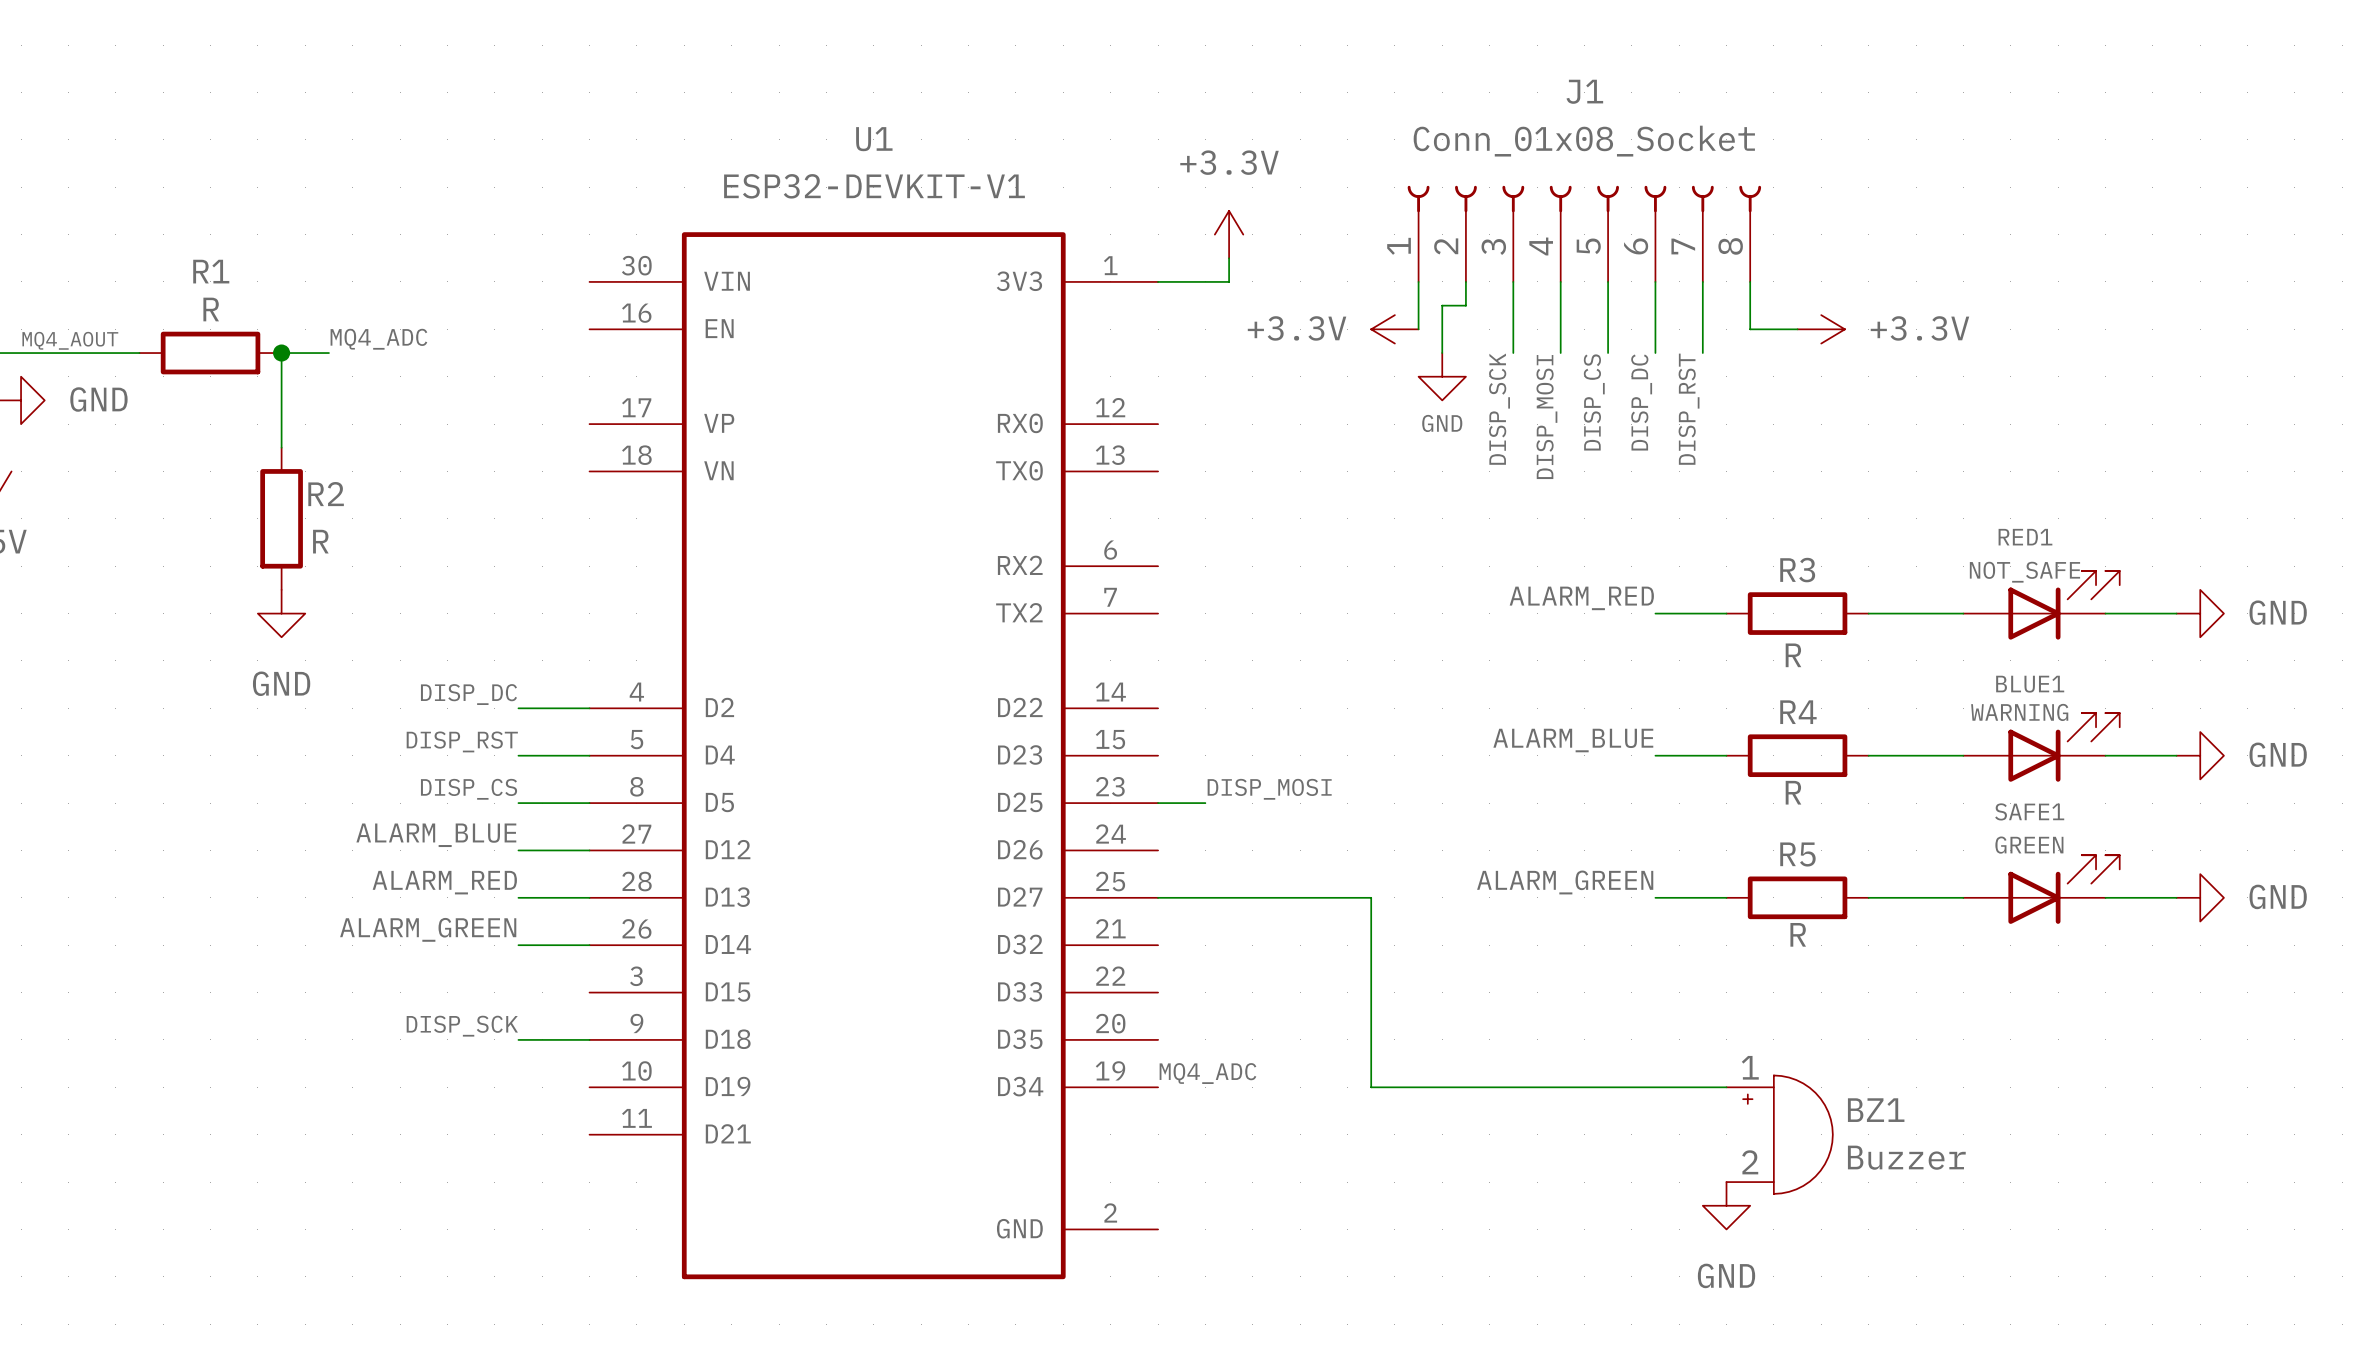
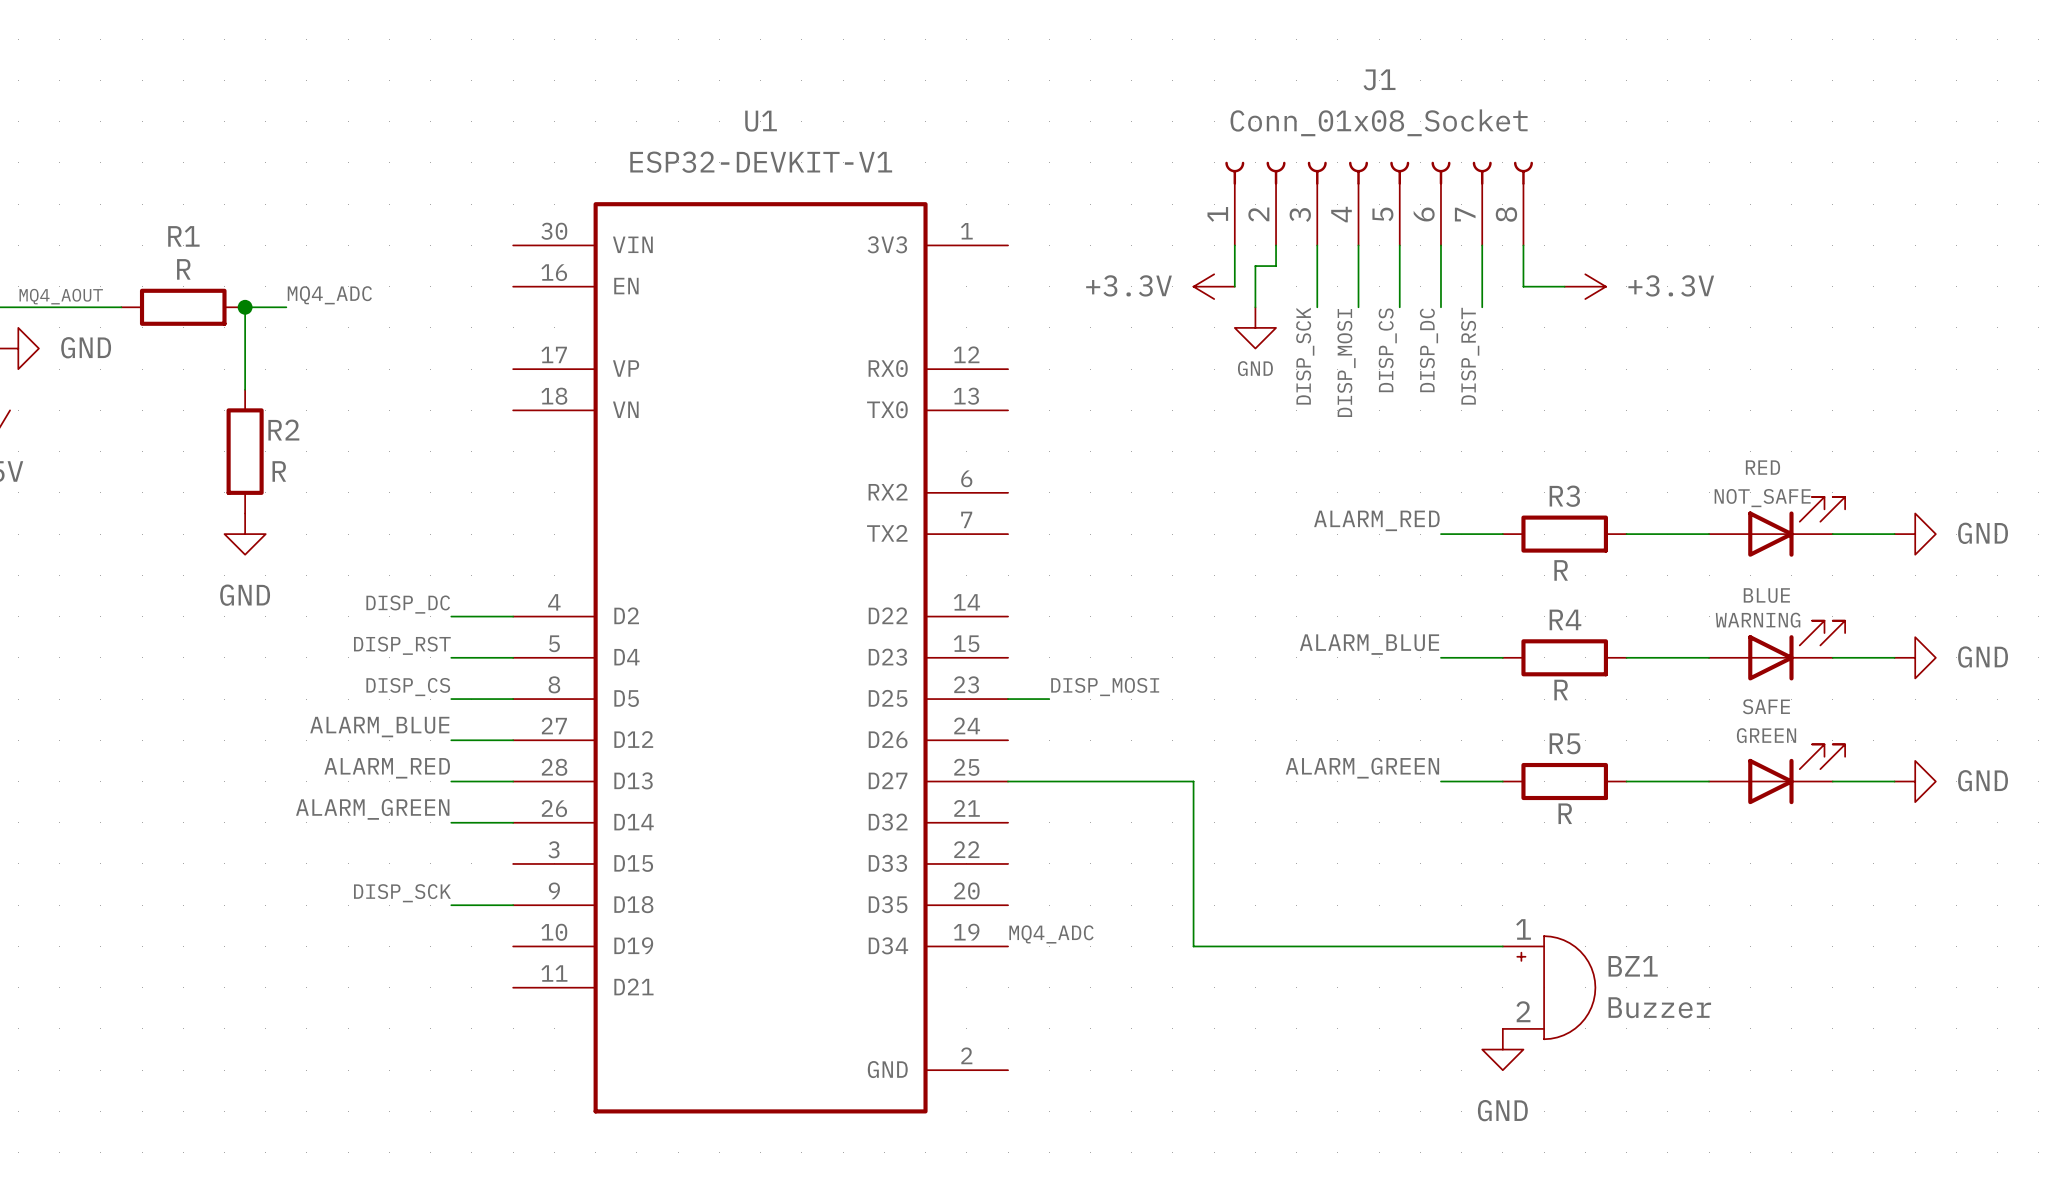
power symbol: +3.3V (1229, 234) -> none
wire: (1229, 258) (1229, 281) (1158, 281) -> none
RED1 name: RED1 (2025, 537) -> RED (1762, 467)
BLUE1 name: BLUE1 (2030, 684) -> BLUE (1766, 595)
SAFE1 name: SAFE1 (2029, 811) -> SAFE (1766, 706)

